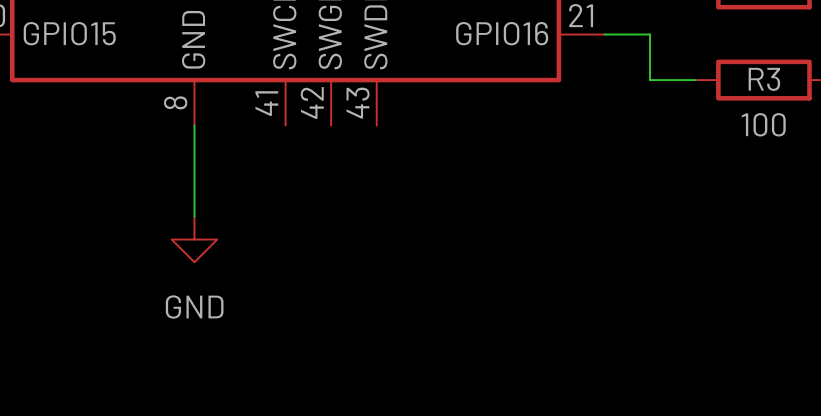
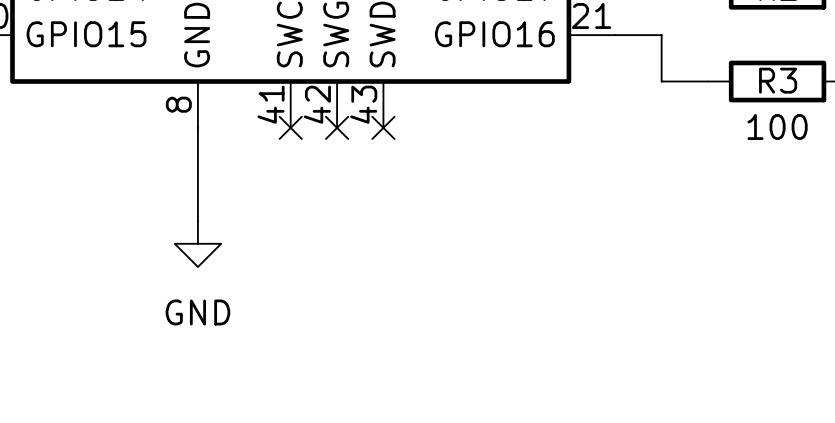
no-connect mark: none -> (290, 127)
no-connect mark: none -> (337, 127)
no-connect mark: none -> (383, 127)

